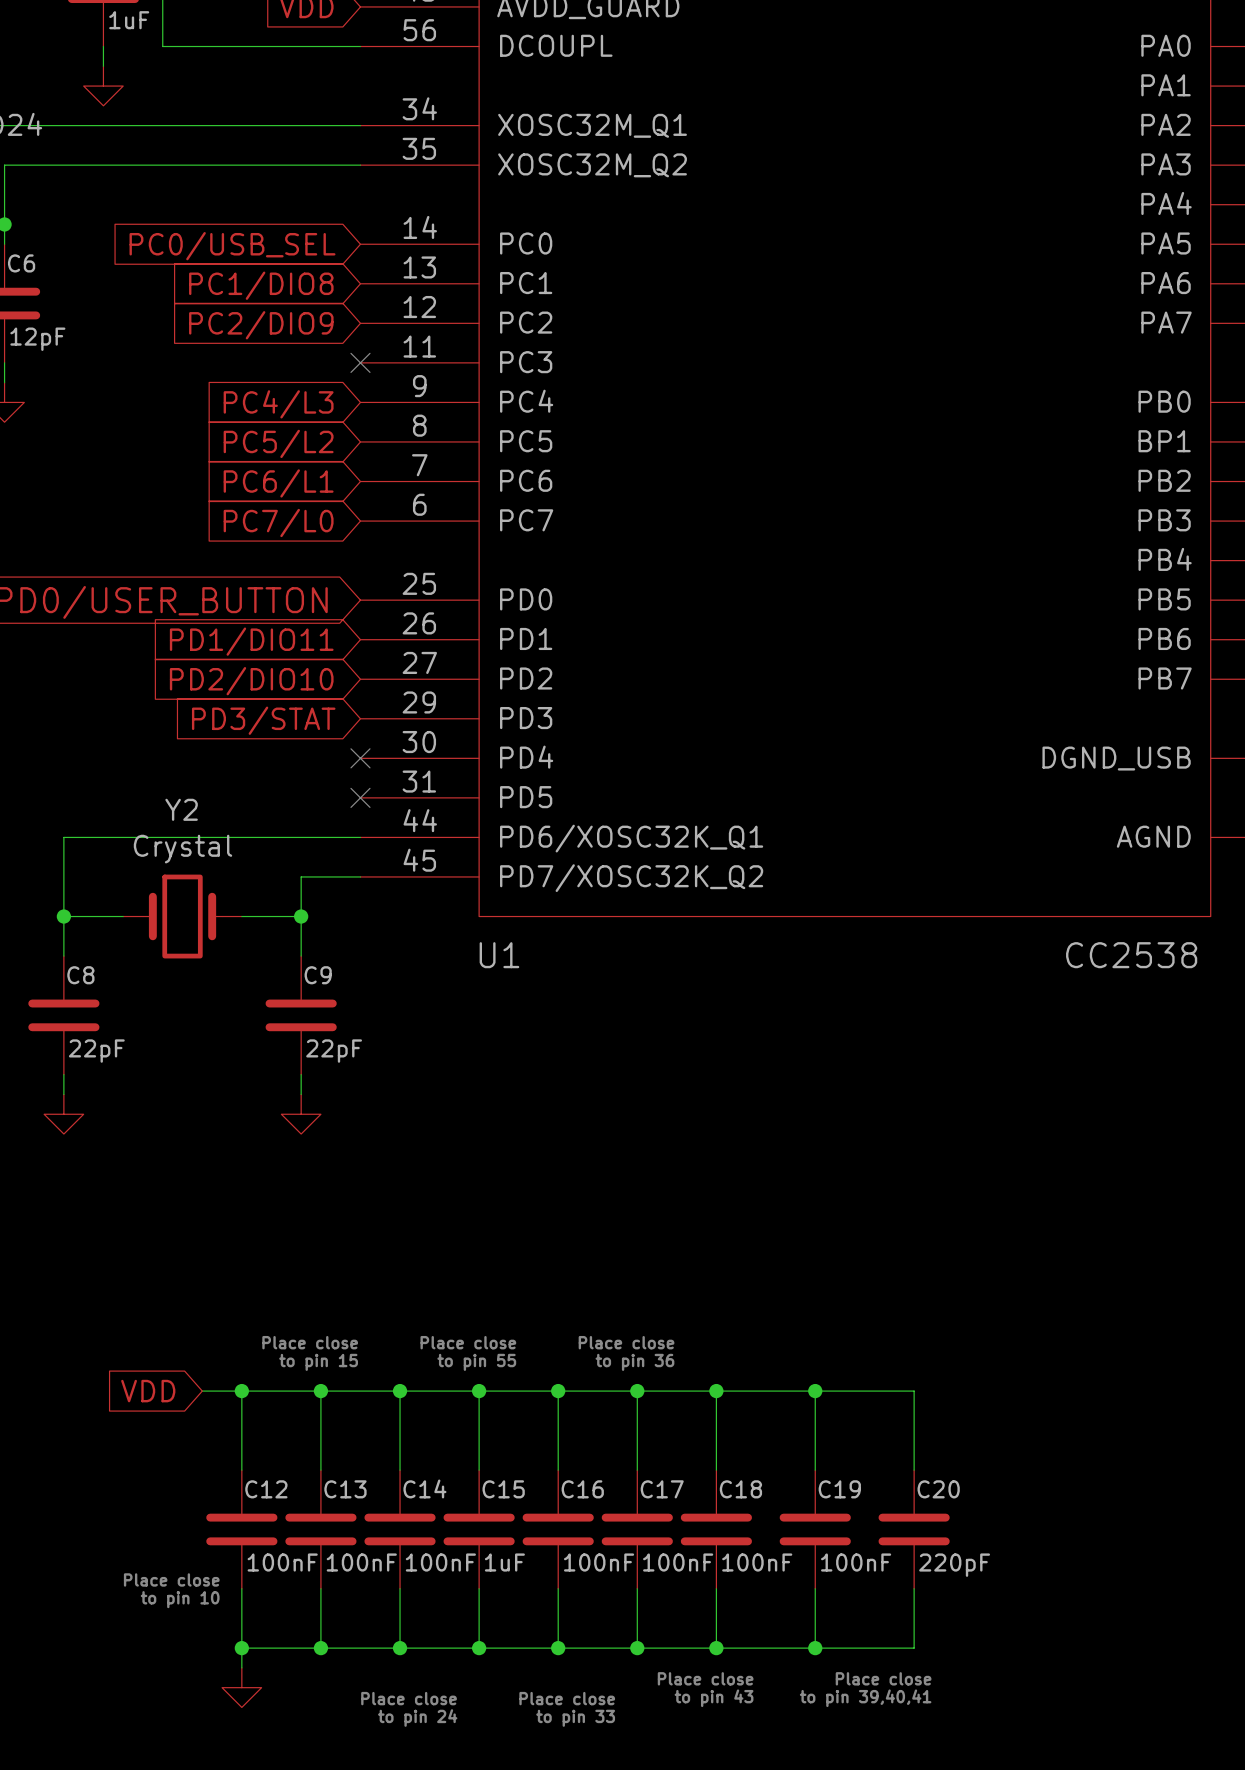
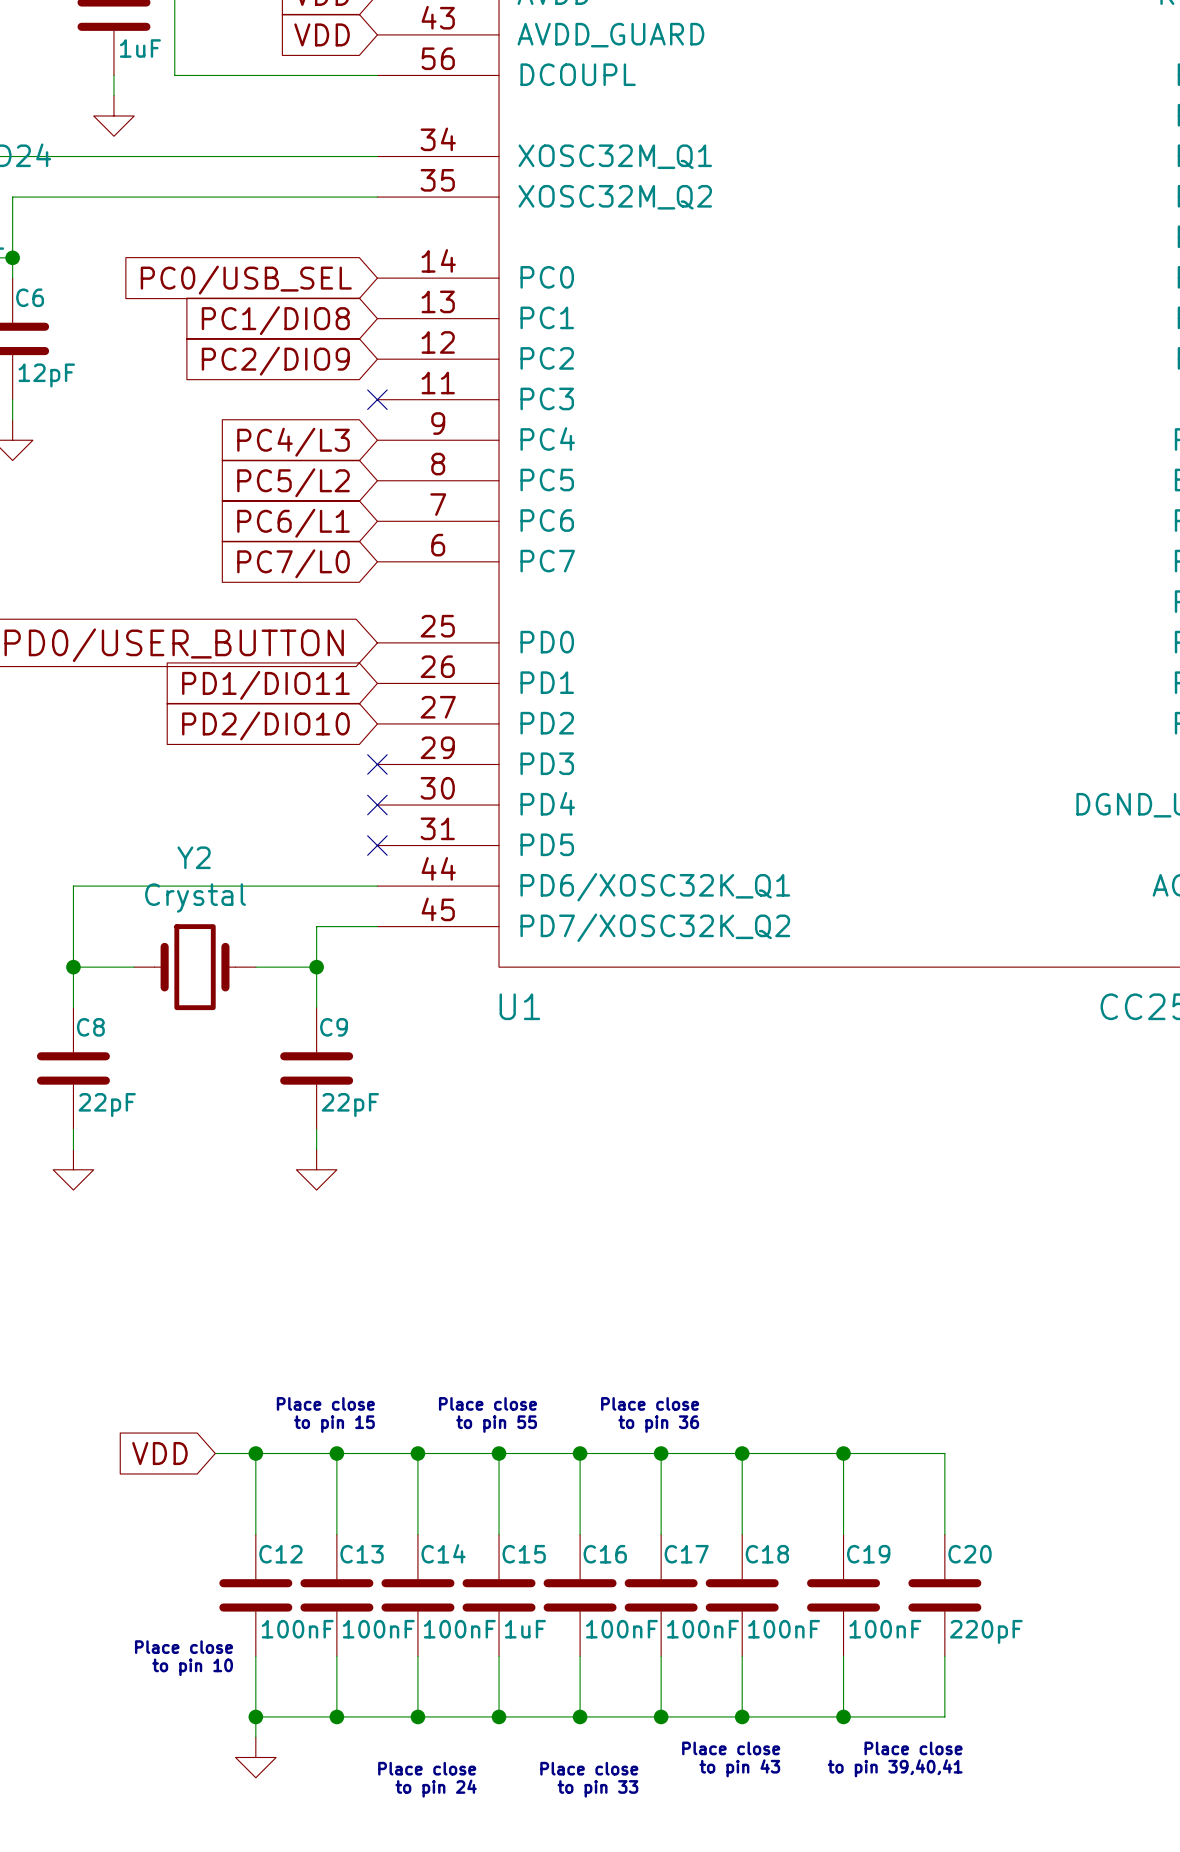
no-connect mark: none -> (377, 764)
global label: PD3/STAT (263, 720) -> none

